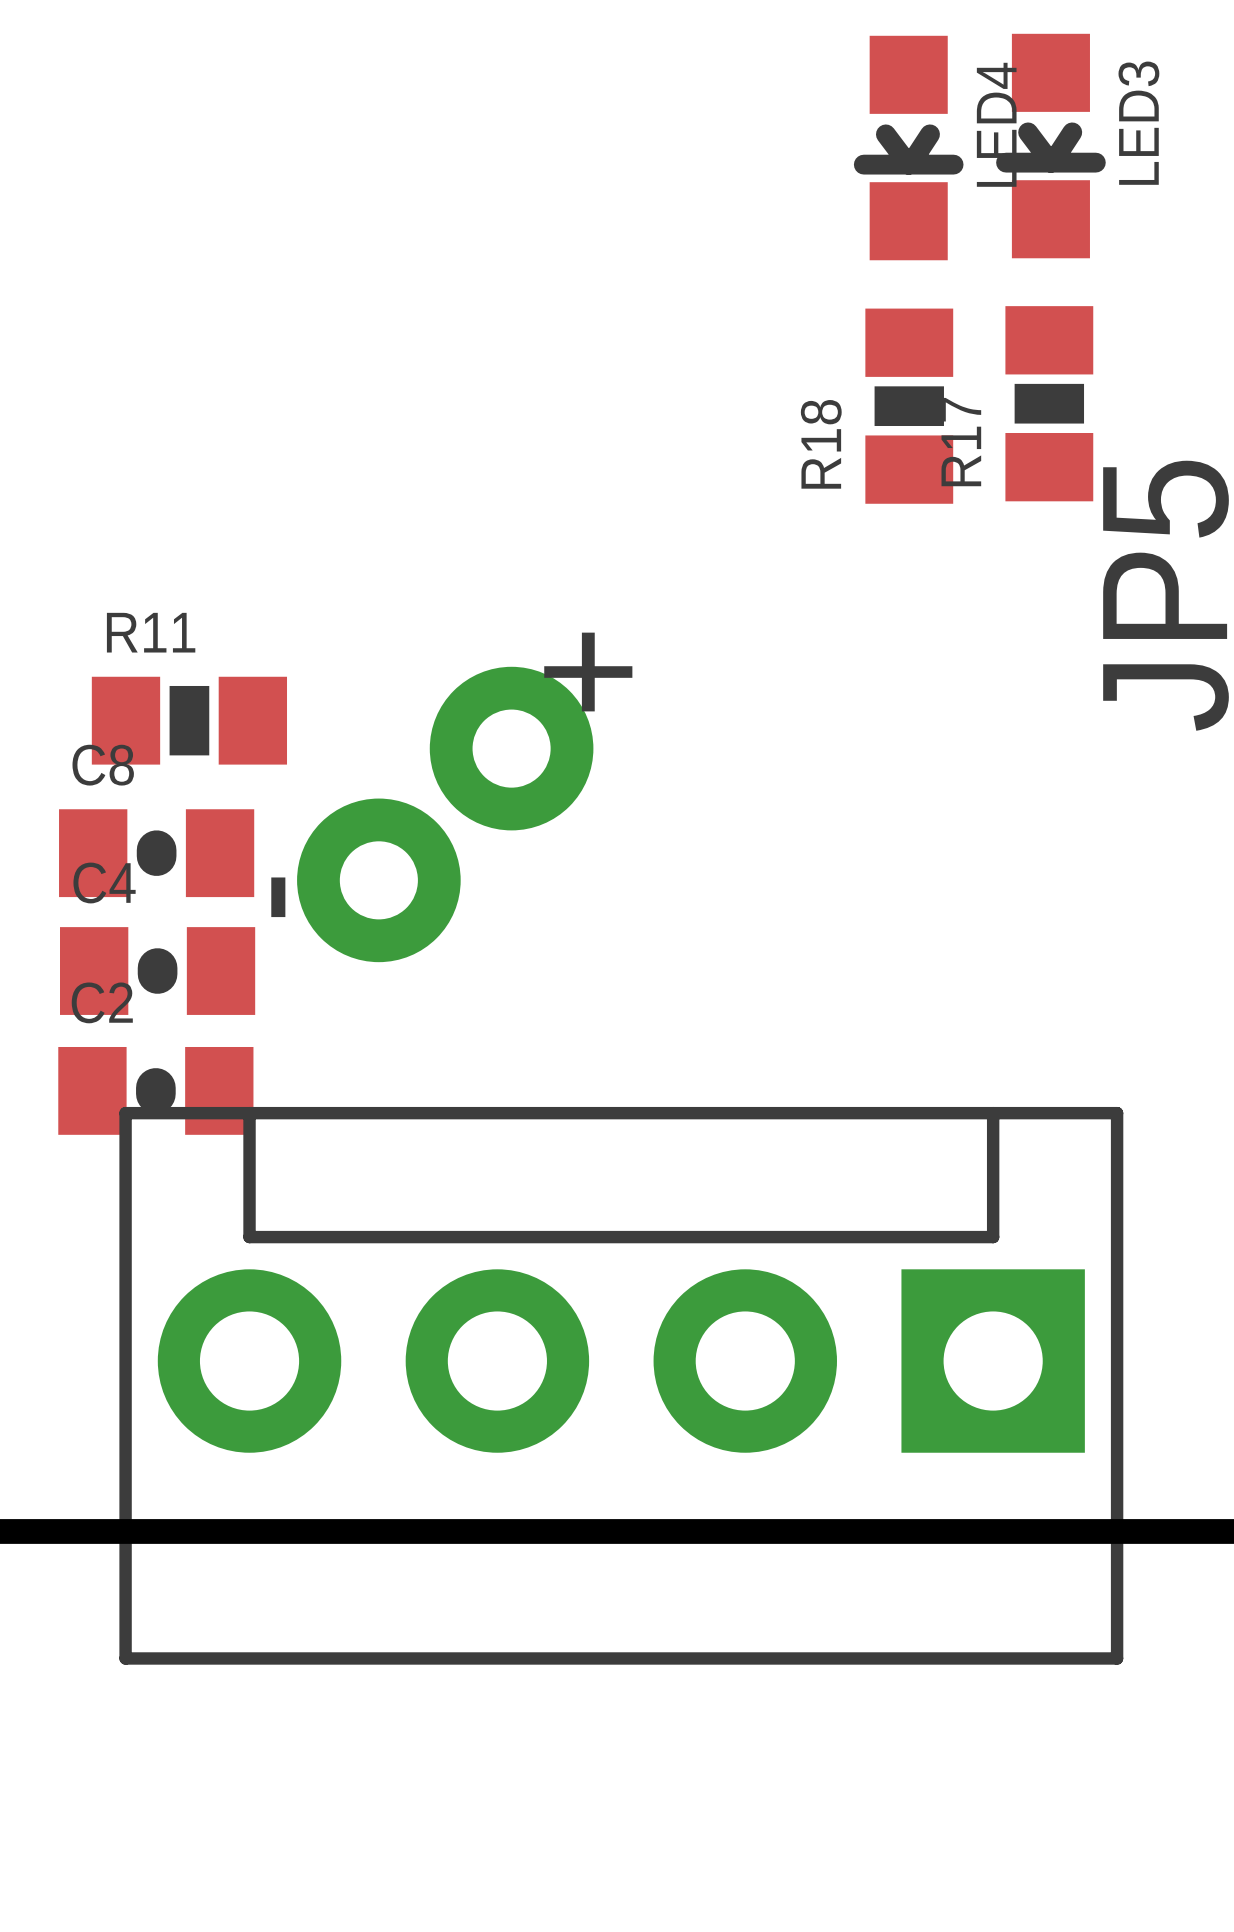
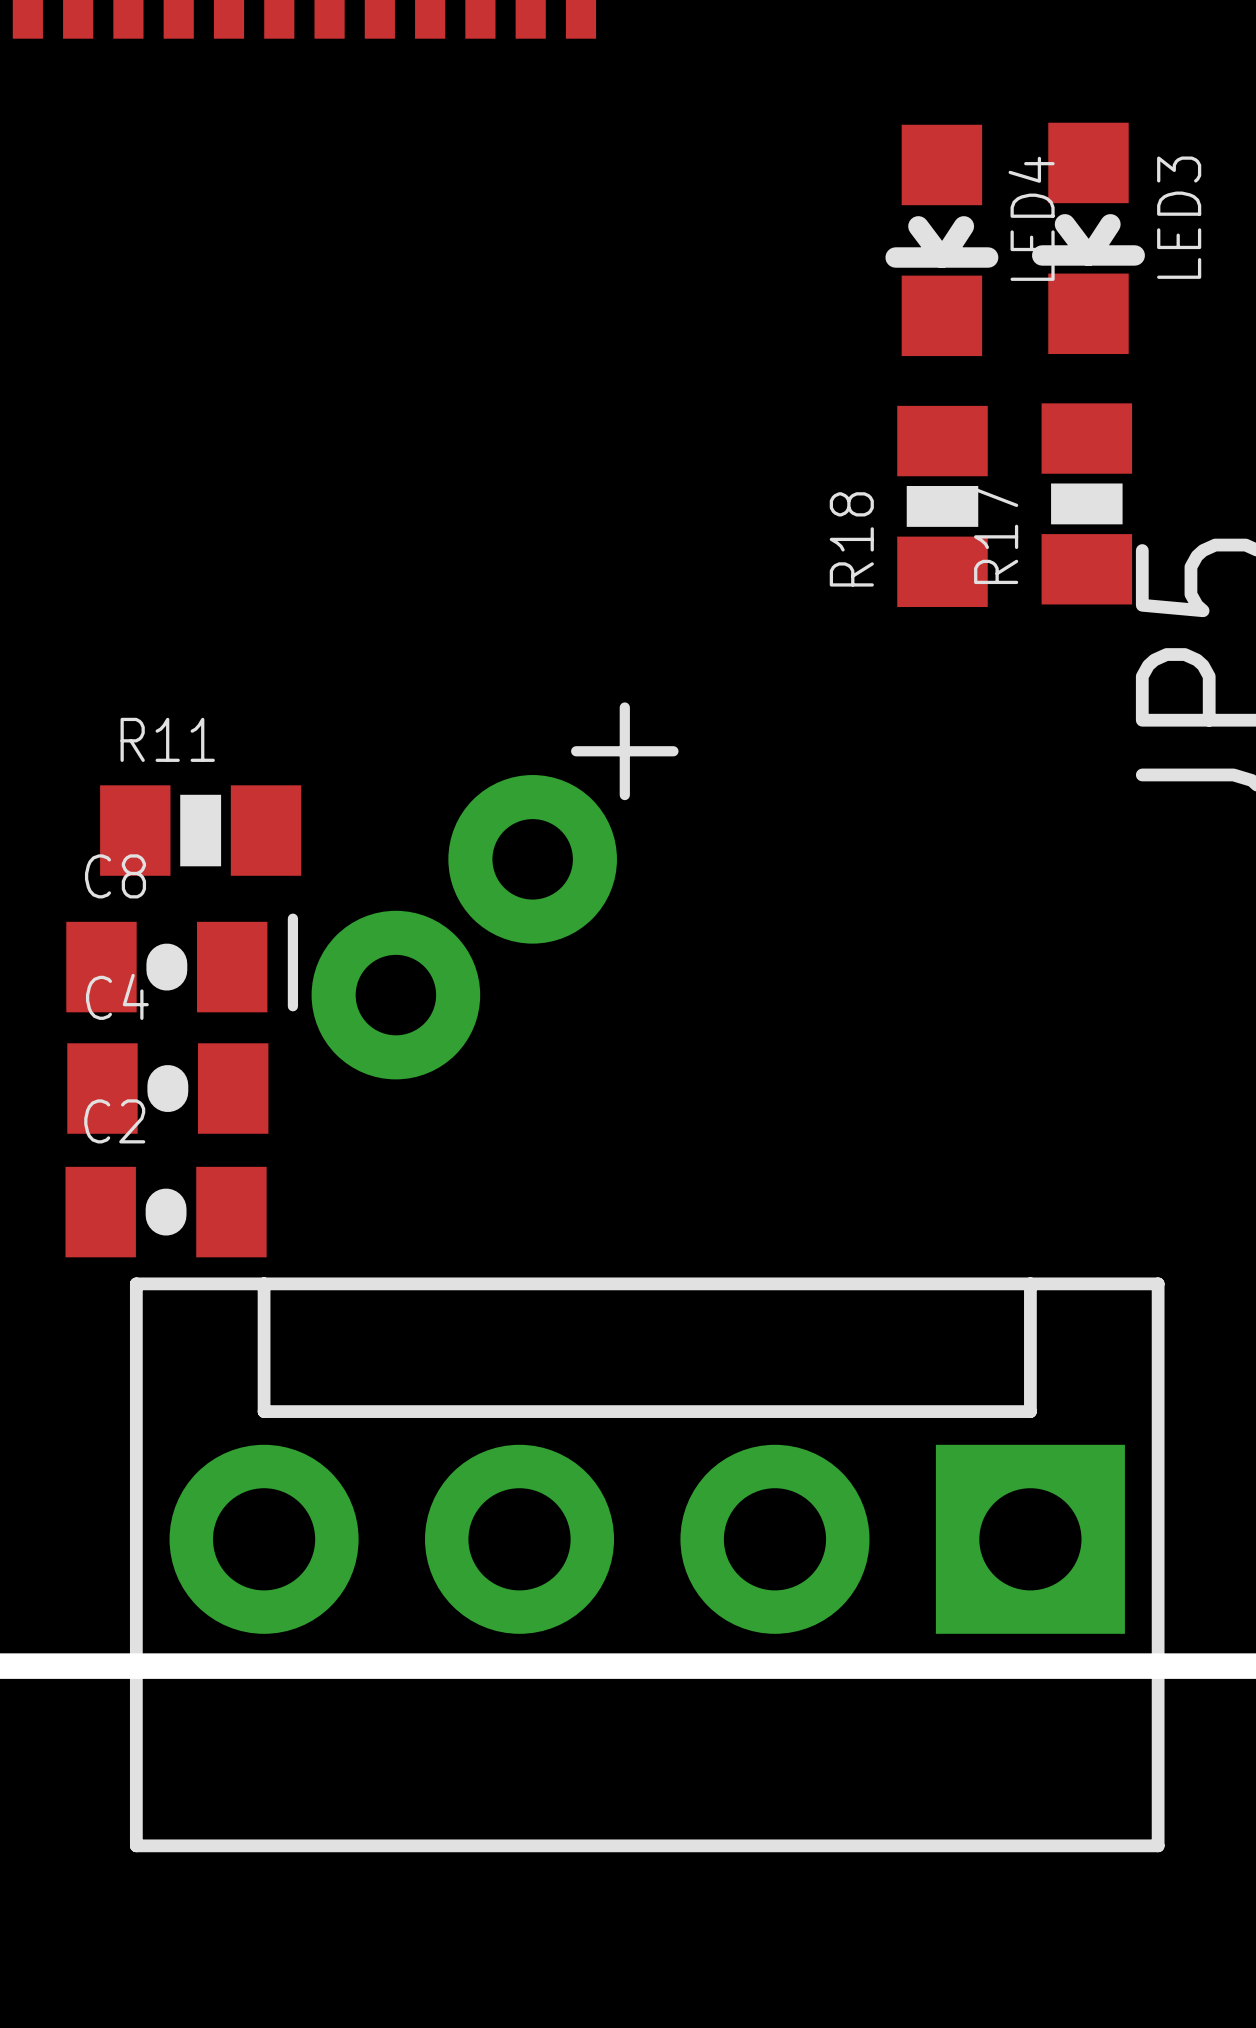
part position: (621, 1385) -> (647, 1564)

